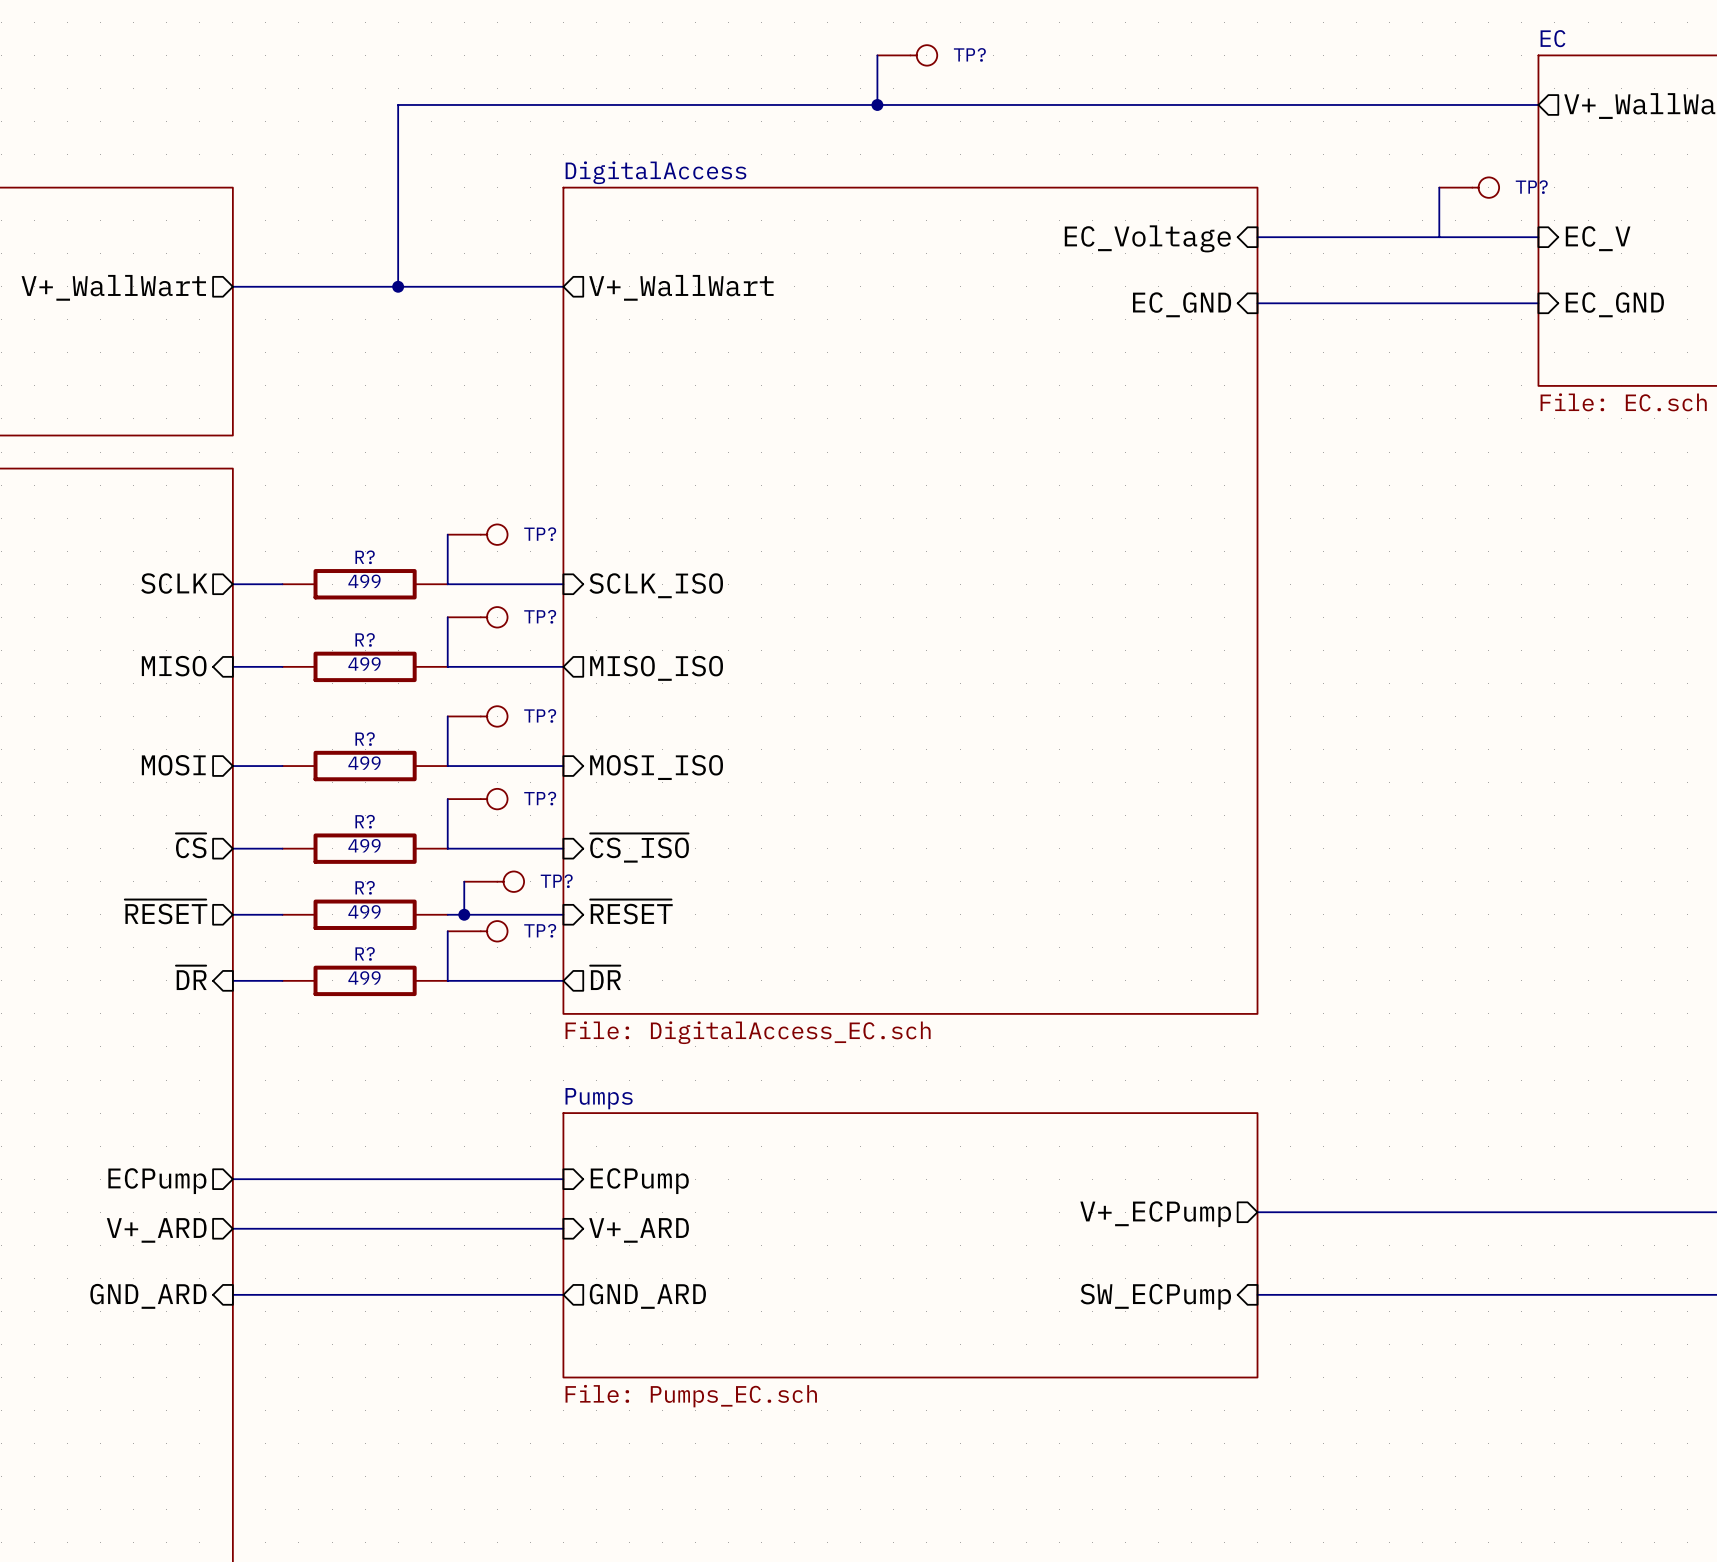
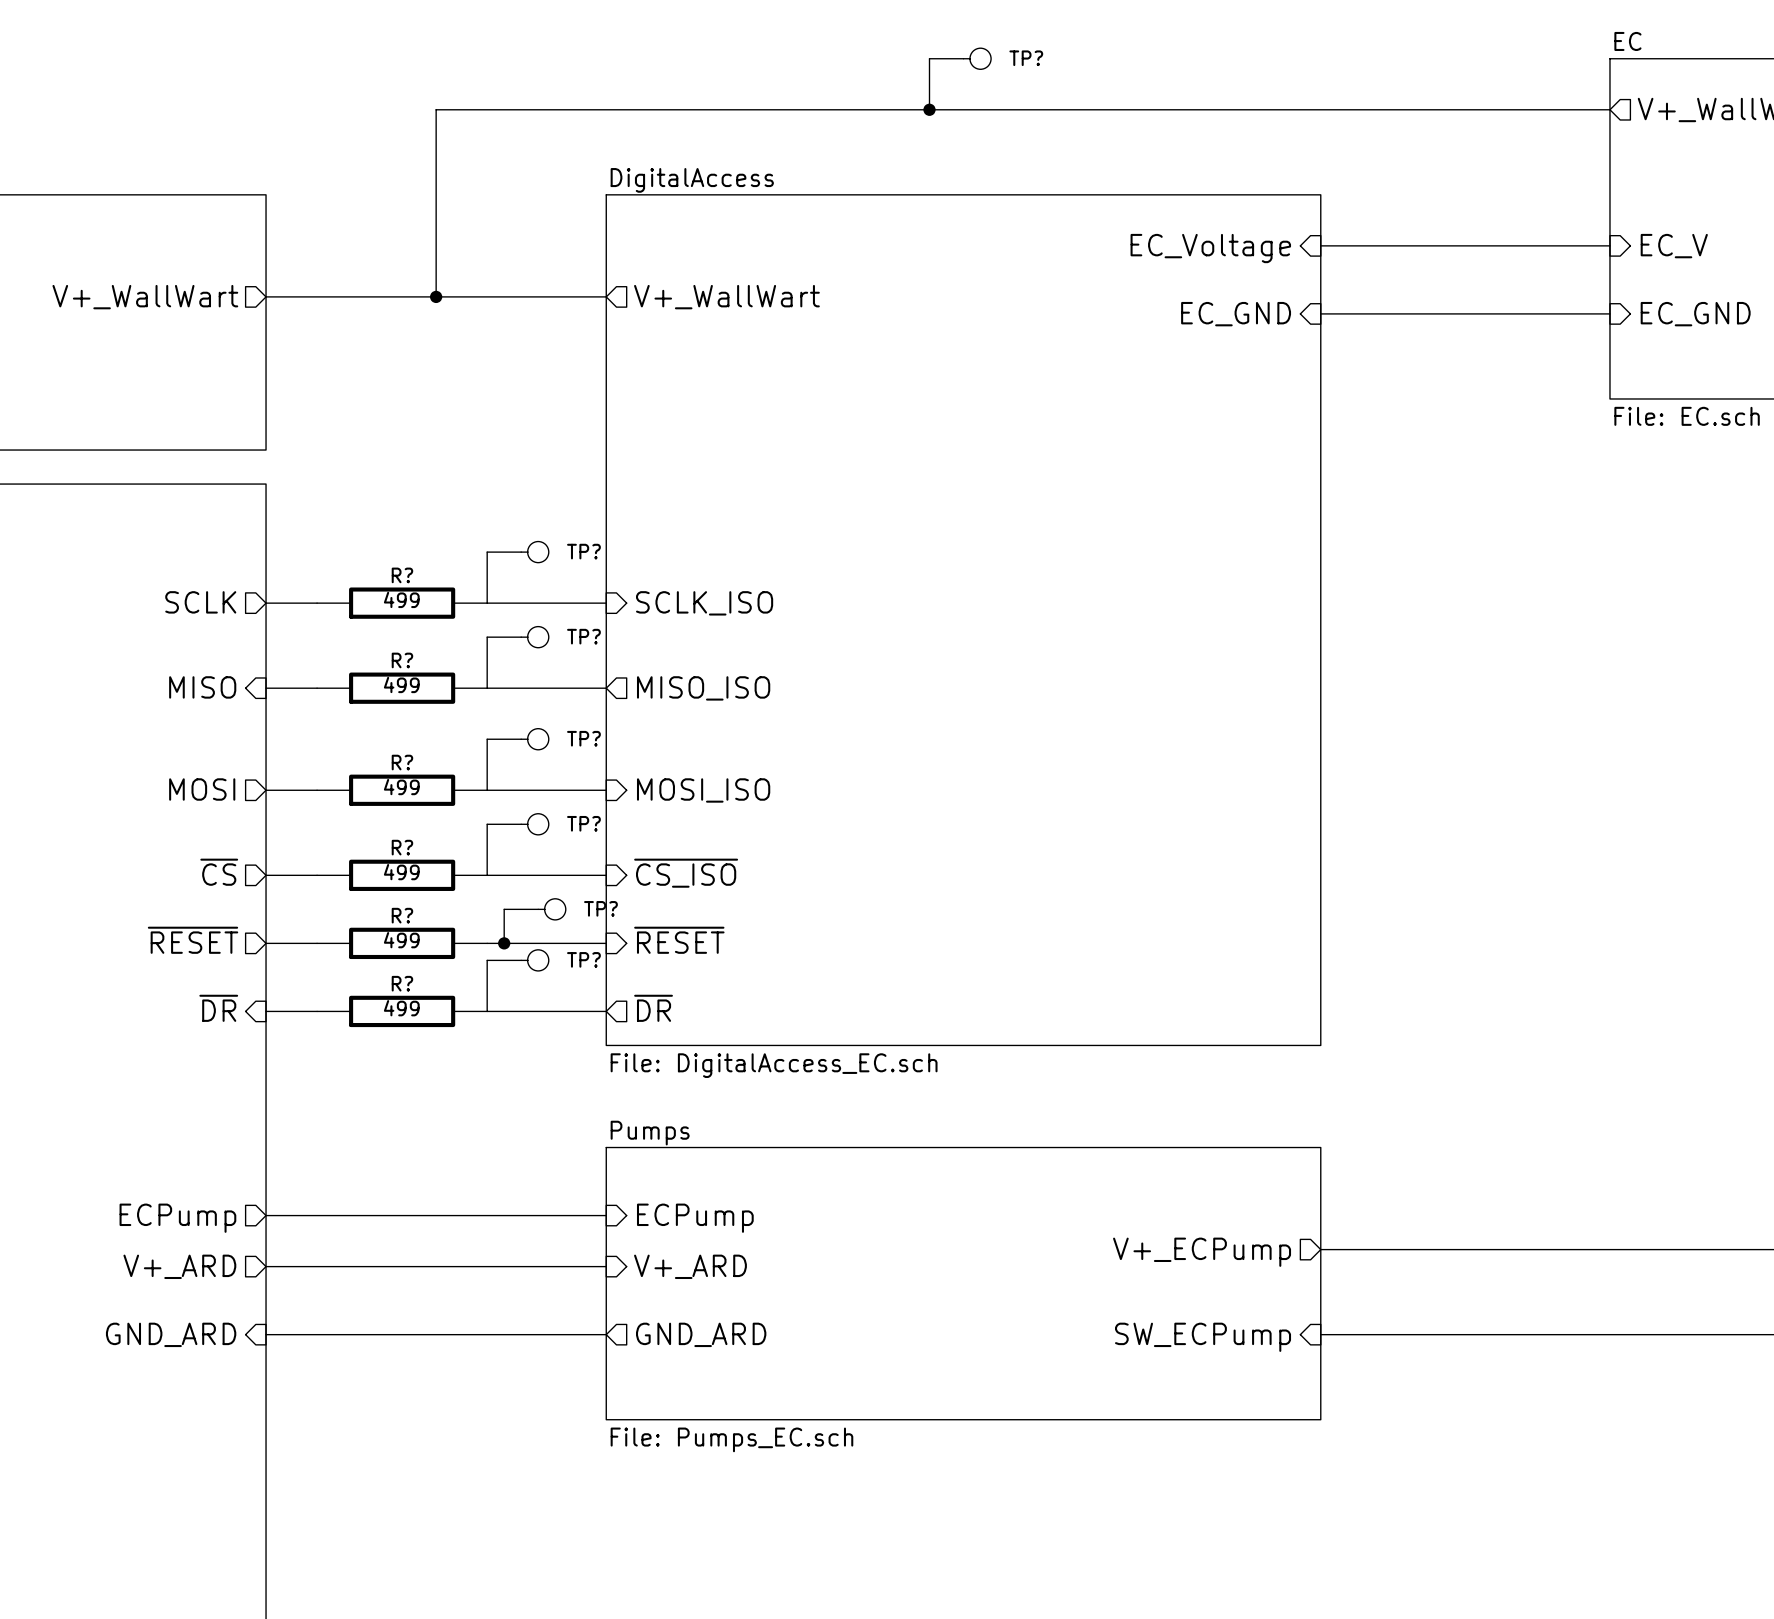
wire: (1439, 187) (1439, 237) -> none
TP?: (1469, 187) -> none

